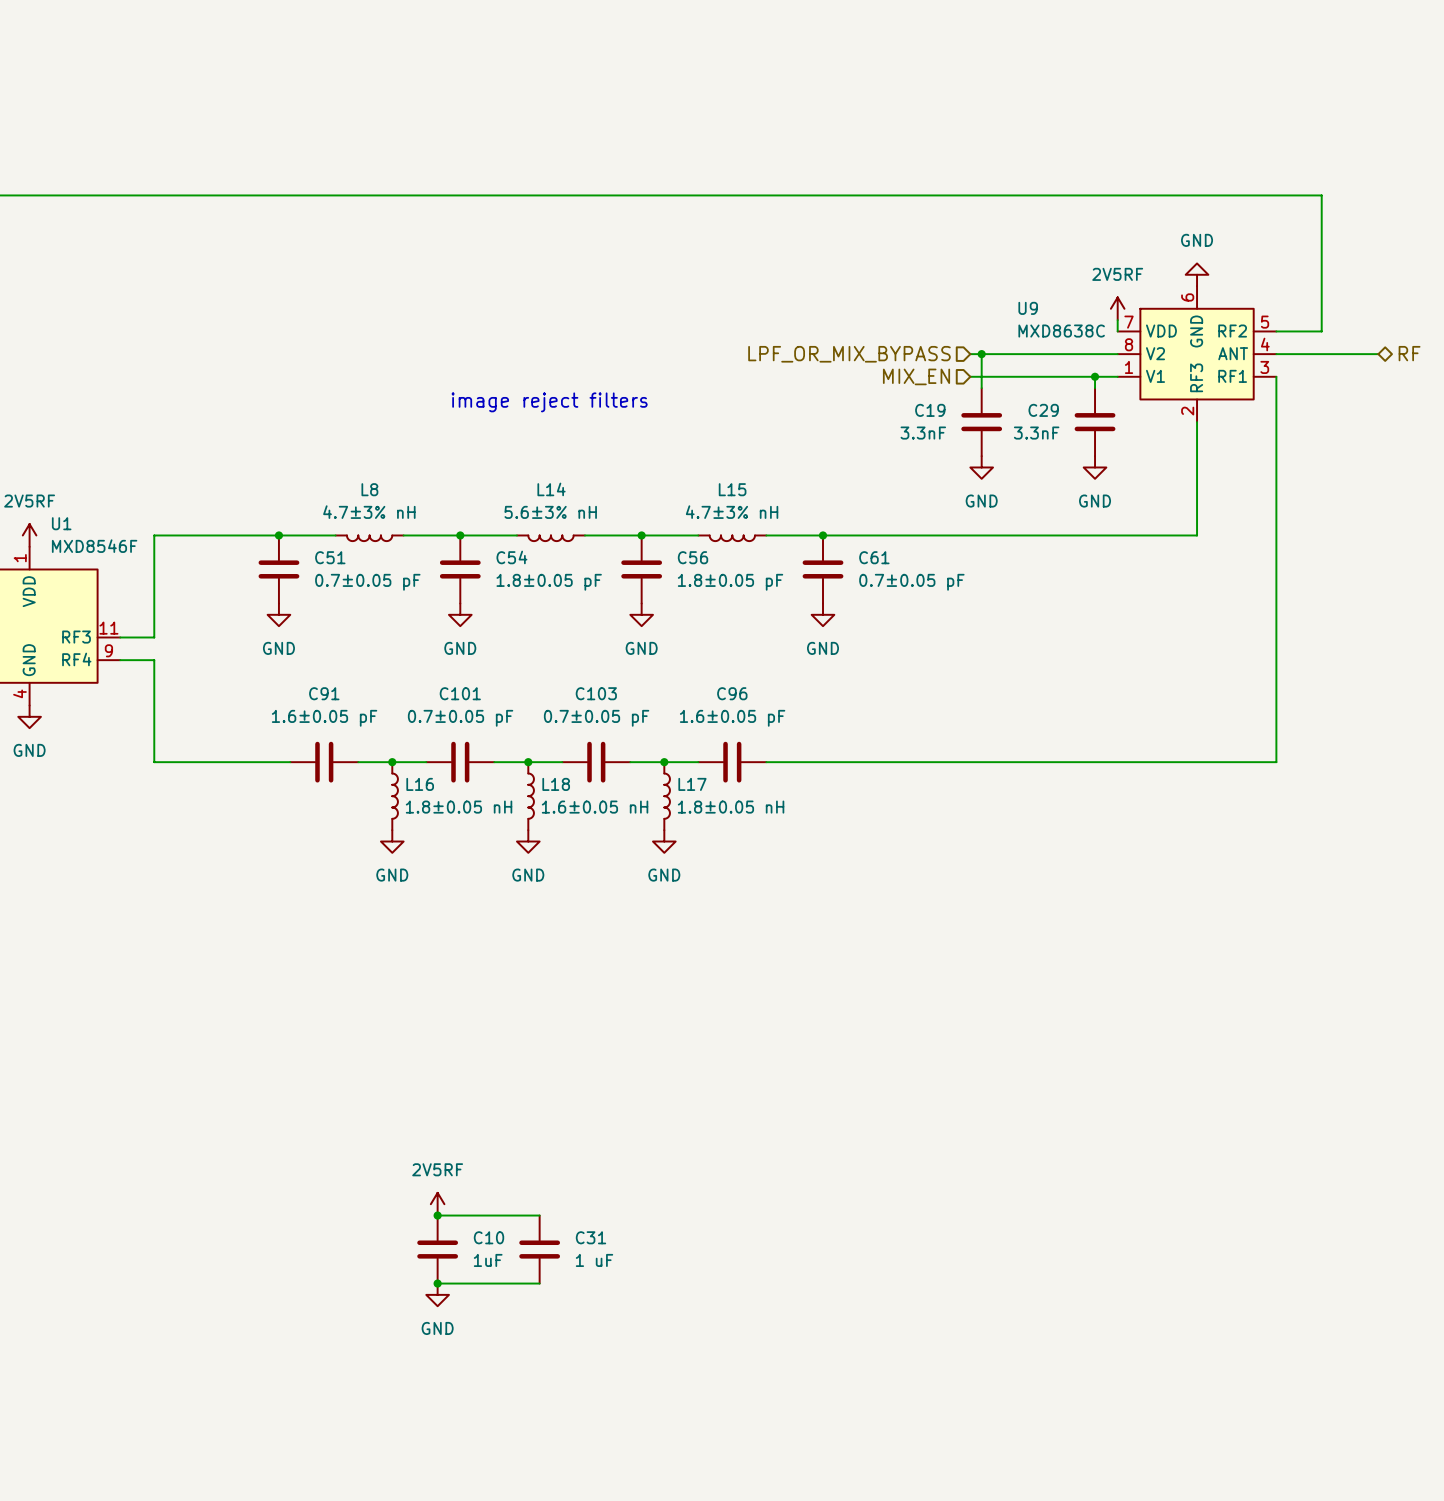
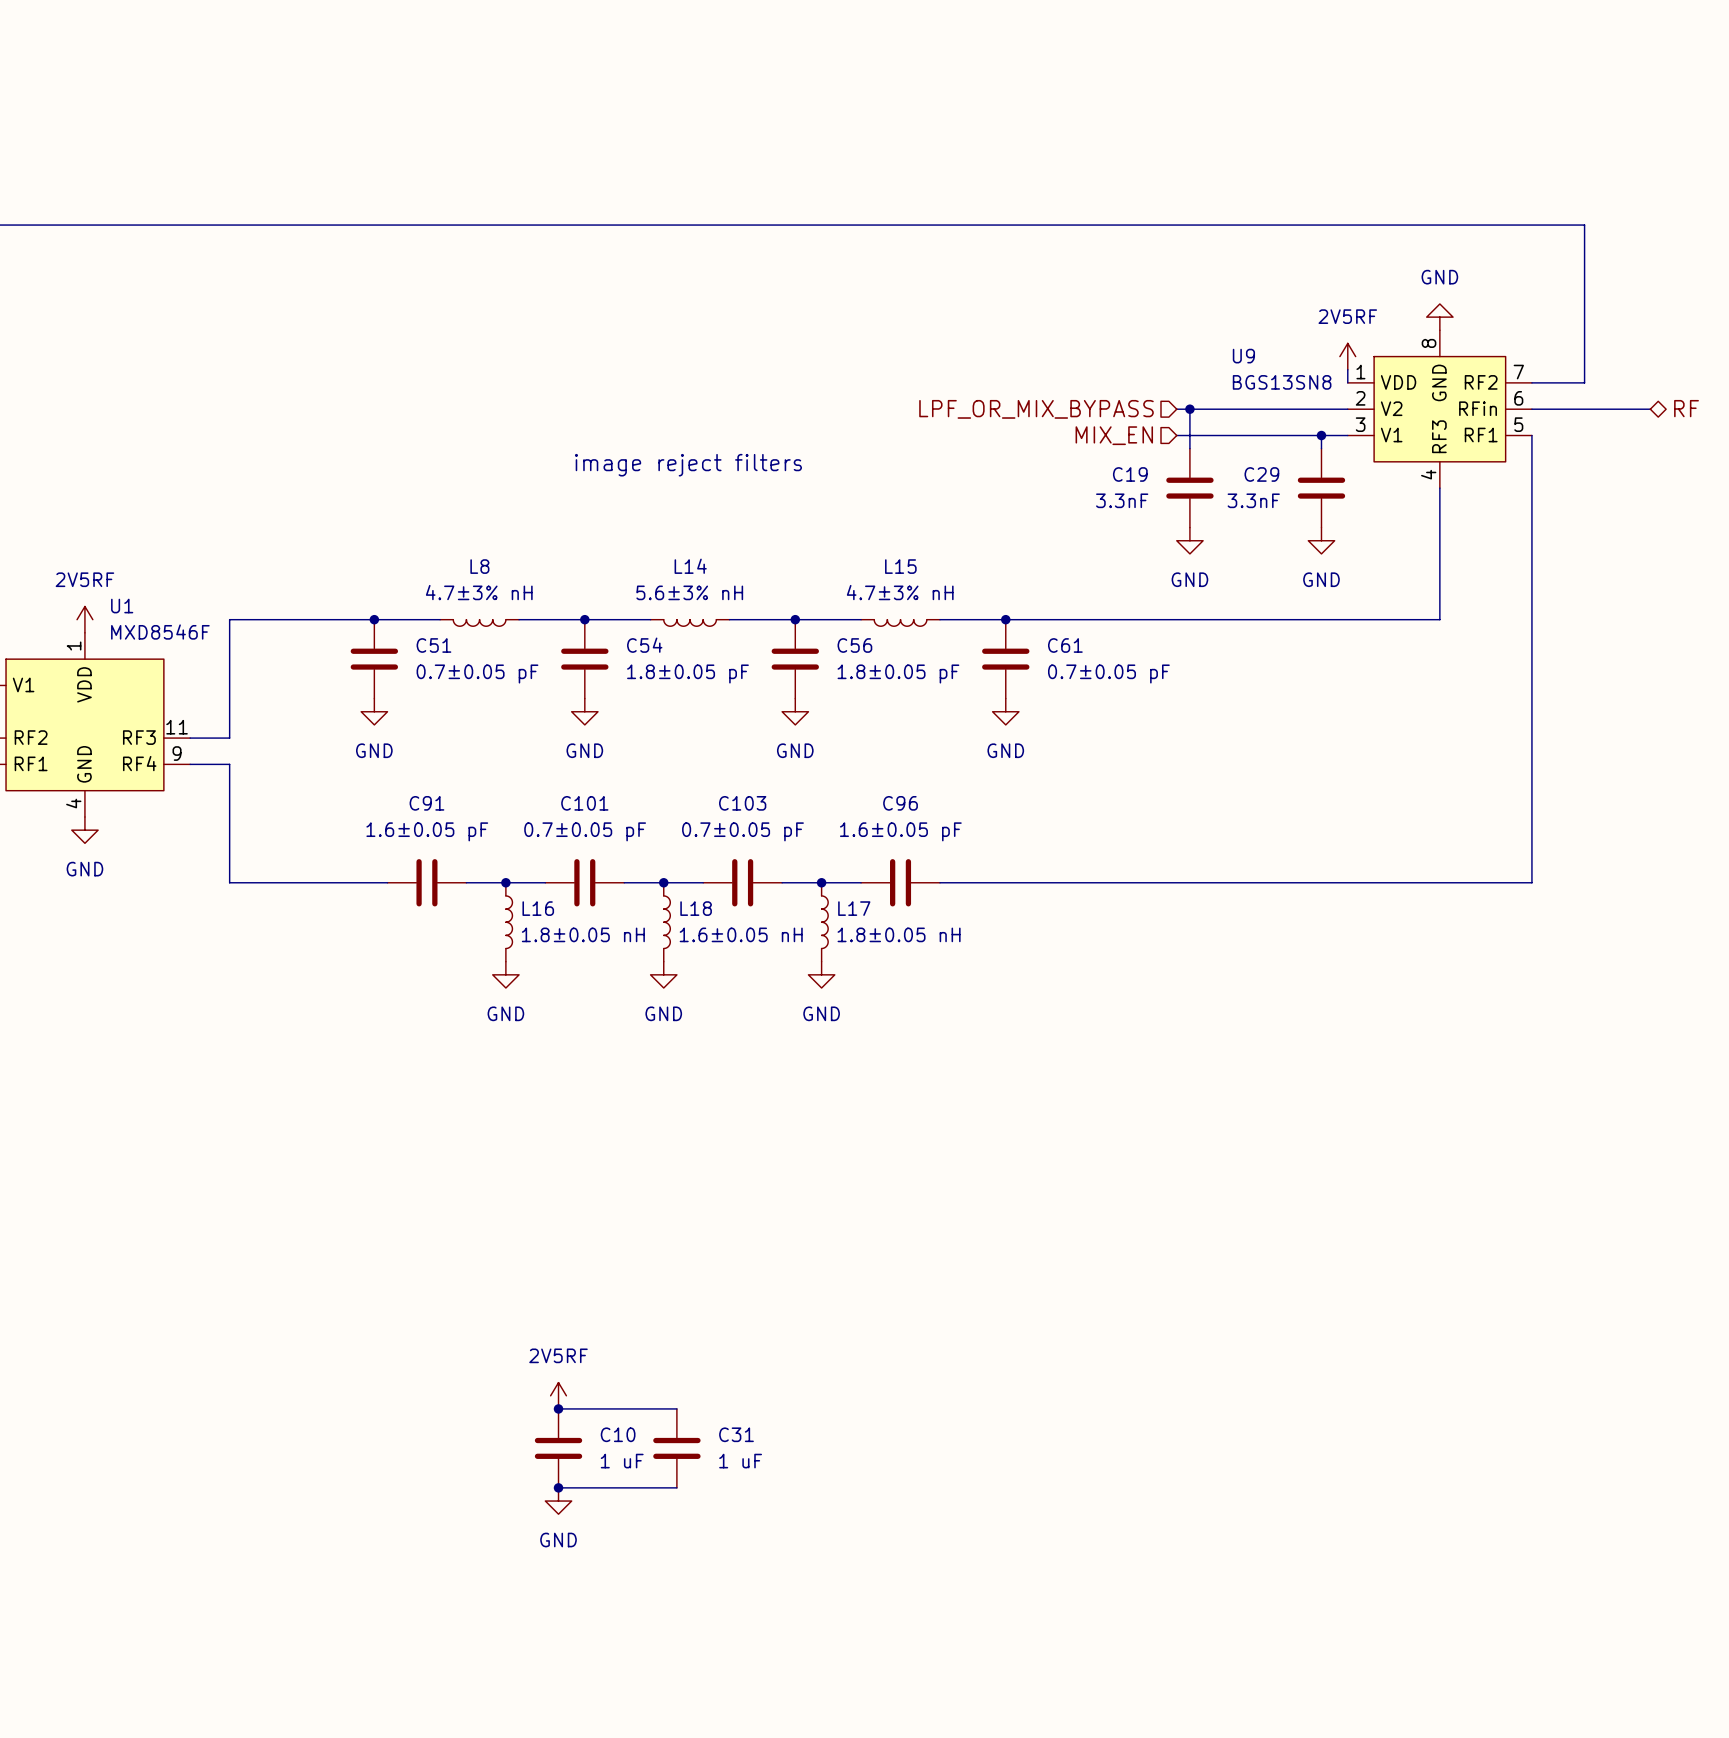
U9 symbol: [1117, 286, 1277, 423] -> [1347, 330, 1532, 489]
U9 value: MXD8638C (1061, 331) -> BGS13SN8 (1282, 382)
C10 value: 1uF (488, 1260) -> 1 uF (622, 1461)

